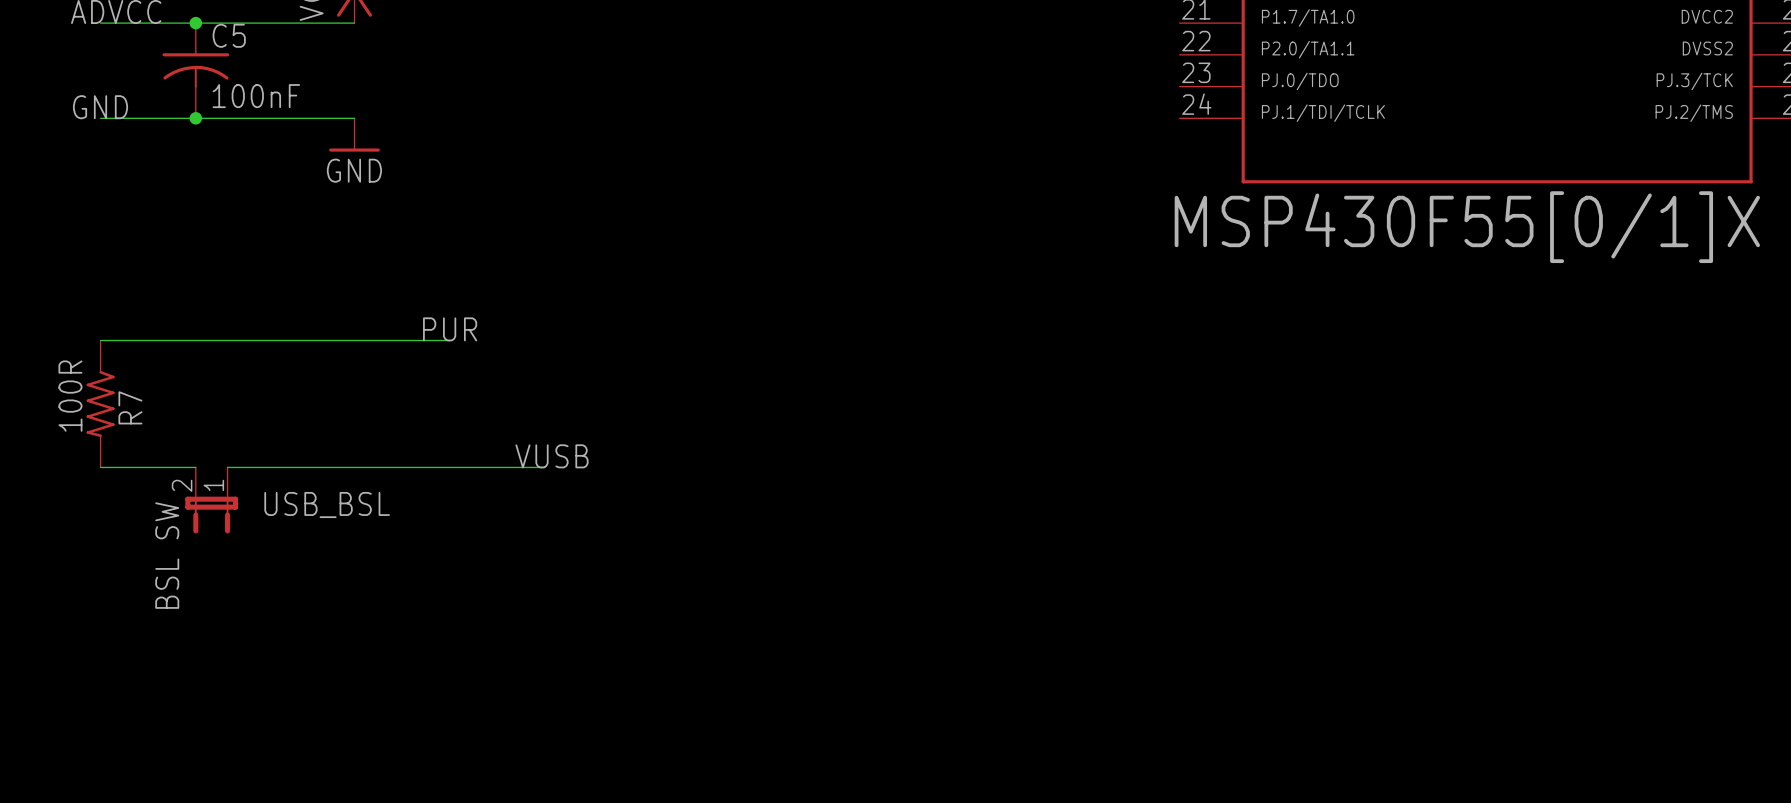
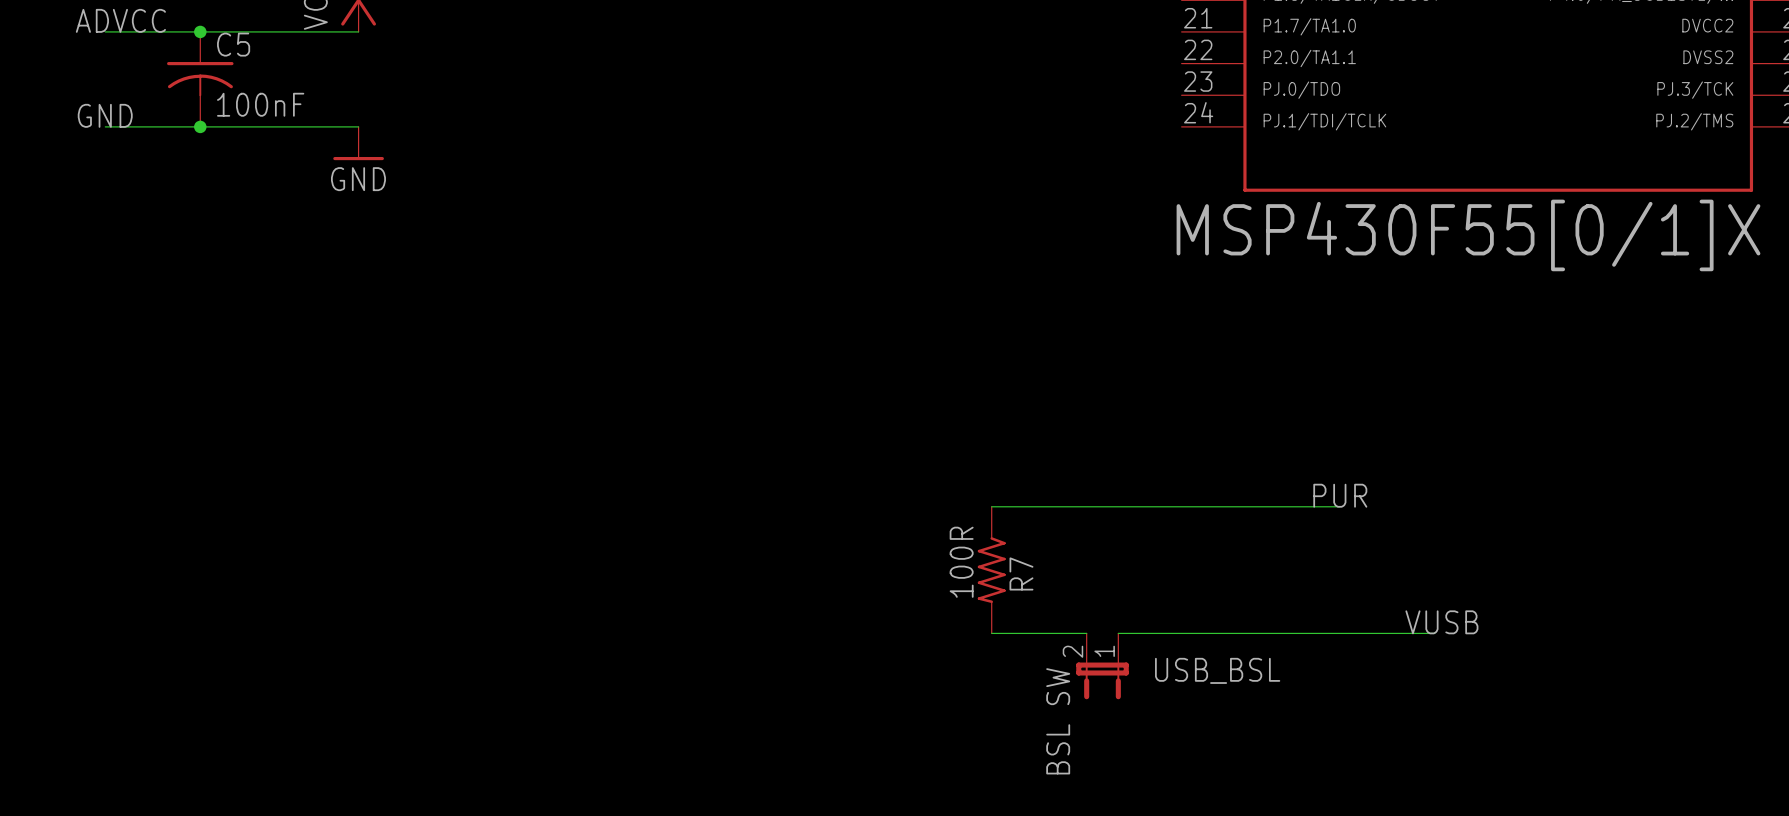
label: PUR (450, 329) -> none
wire: (100, 340) (449, 340) -> none
R7 position: (100, 403) -> (991, 570)
label: VUSB (551, 456) -> none
wire: (100, 467) (195, 467) -> none
wire: (227, 467) (544, 467) -> none
label: none -> PUR (1340, 495)
wire: none -> (991, 506) (1339, 506)
USB_BSL: BSL SW (211, 500) -> none
label: none -> VUSB (1441, 622)
wire: none -> (991, 633) (1086, 633)
wire: none -> (1118, 633) (1434, 633)
USB_BSL: none -> BSL SW (1102, 666)

